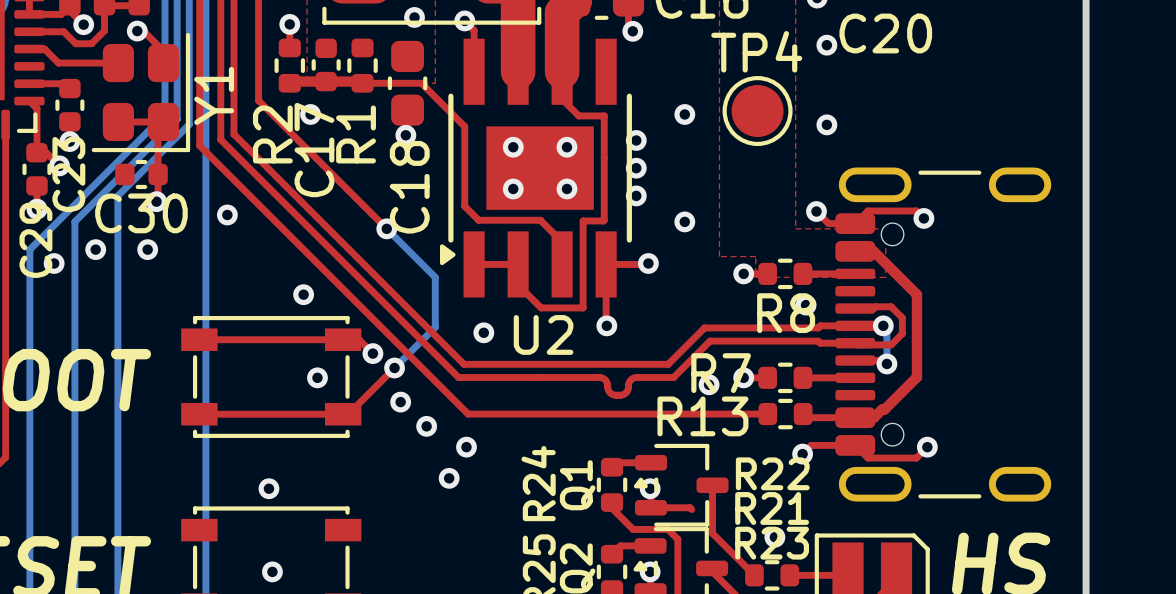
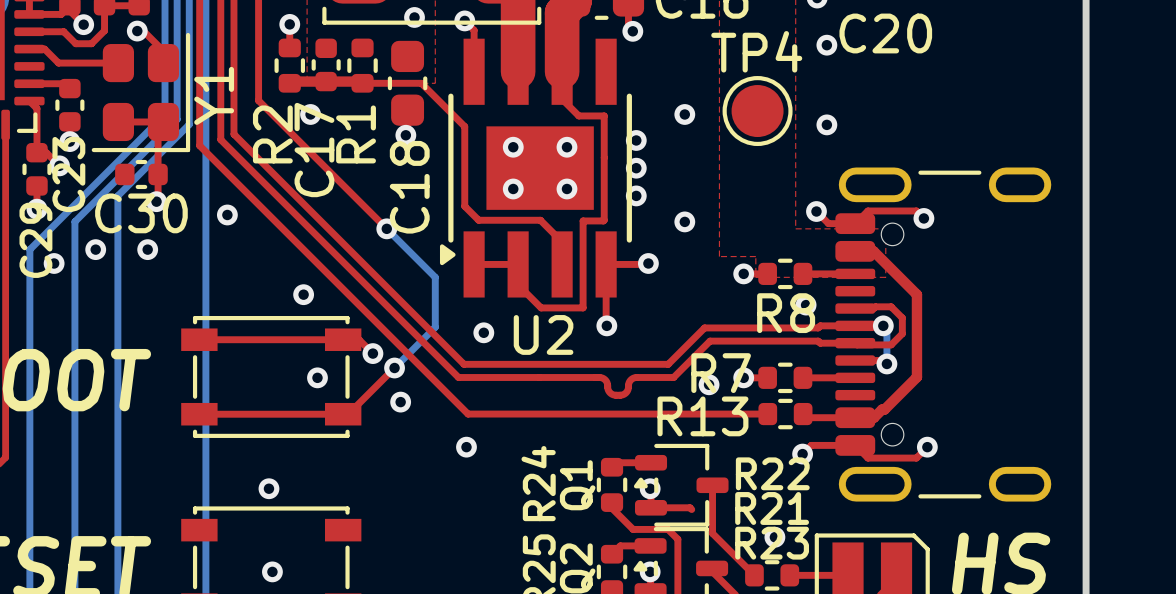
via: (426, 426) -> none
via: (449, 478) -> none

